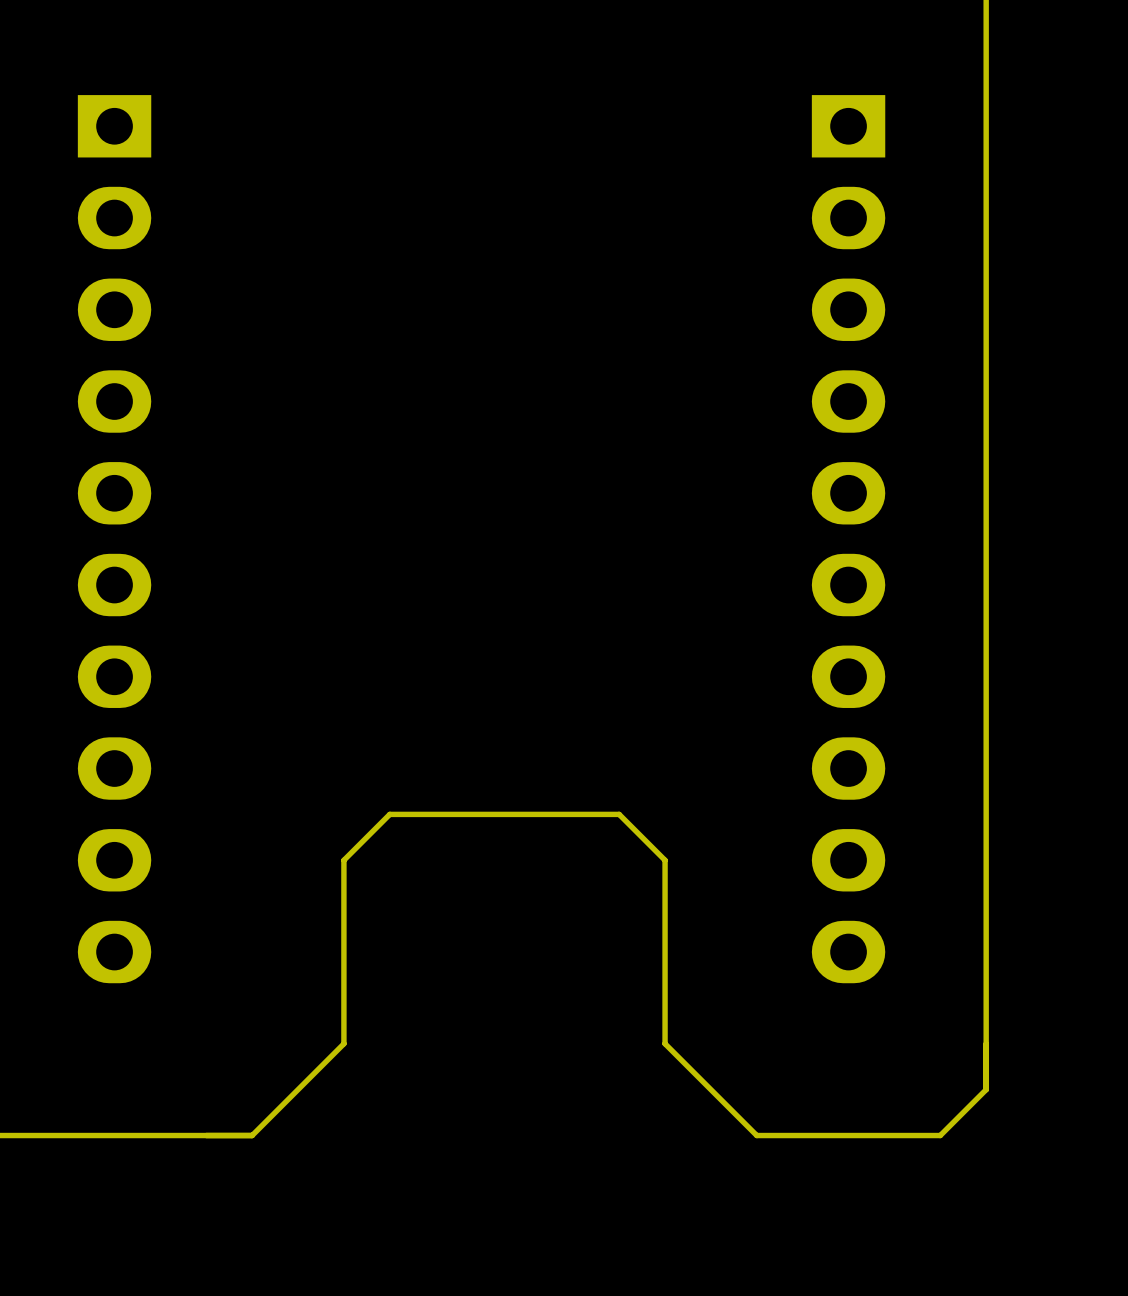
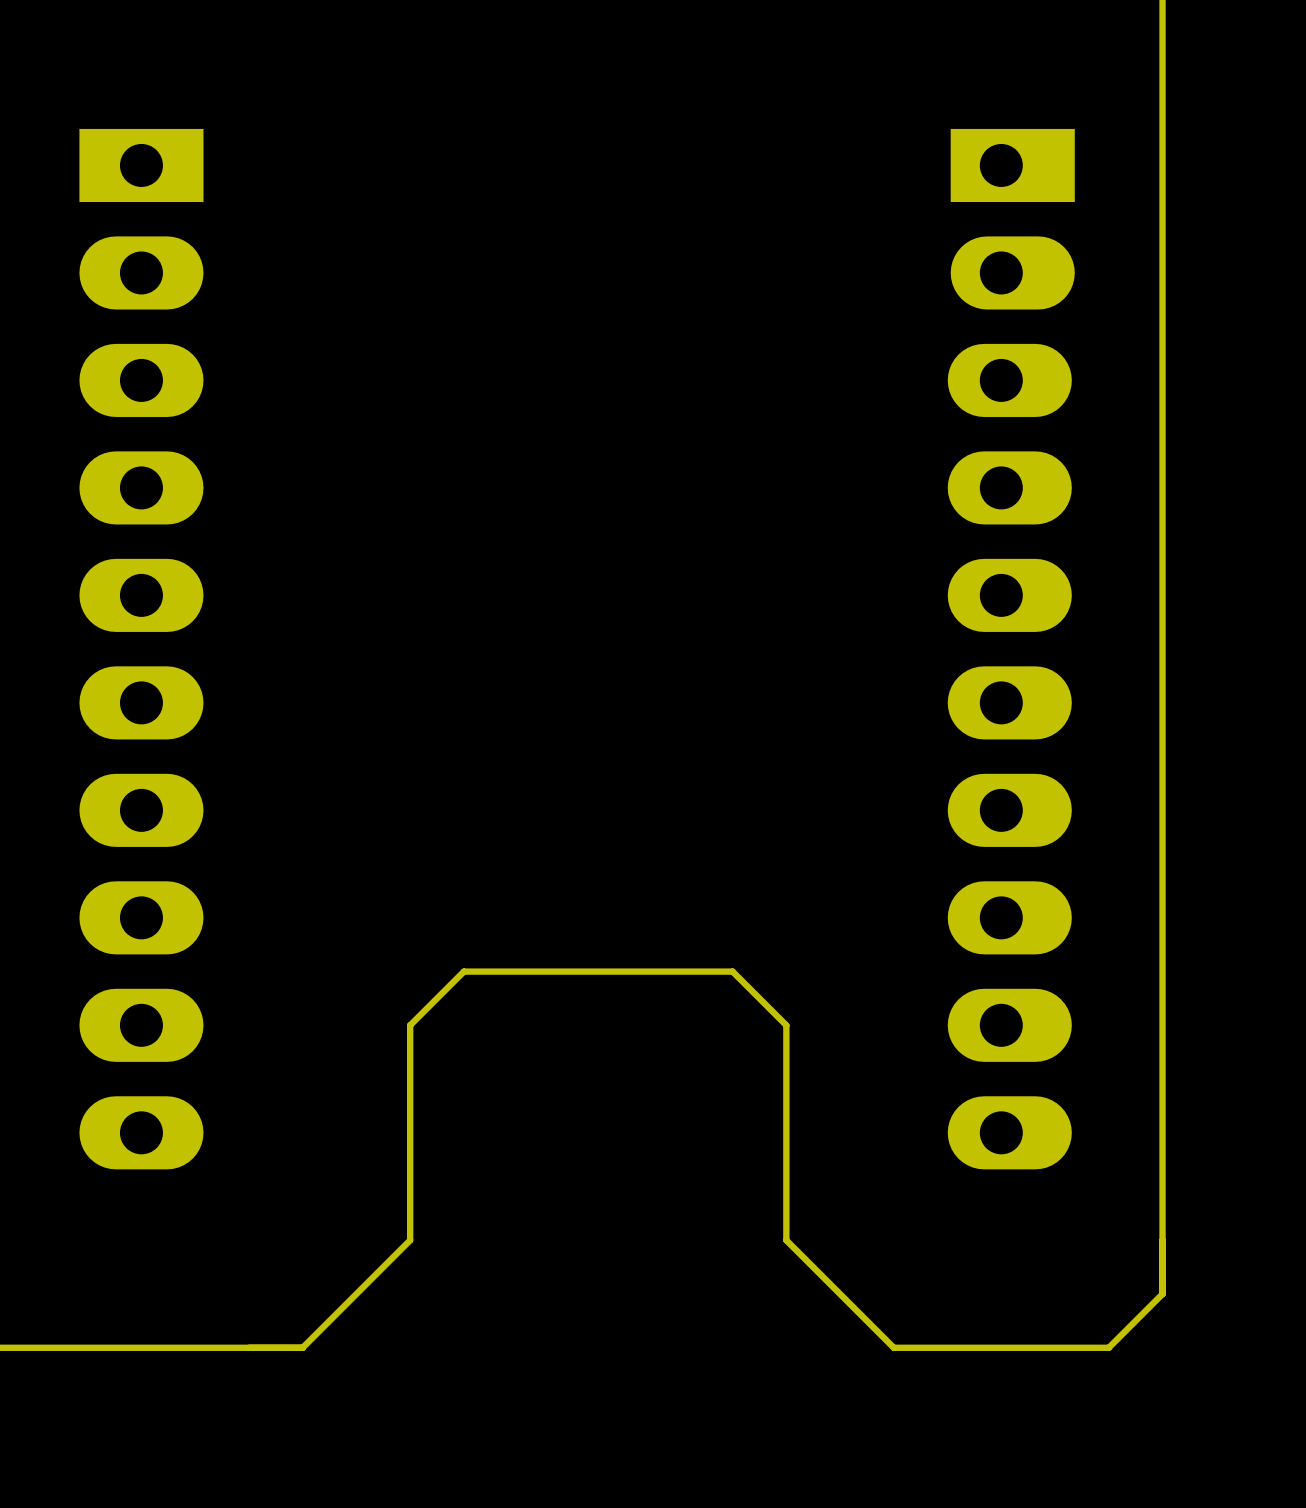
part footprint: [77, 95, 152, 984] -> [79, 128, 204, 1170]
part footprint: [811, 95, 886, 984] -> [947, 128, 1075, 1170]

